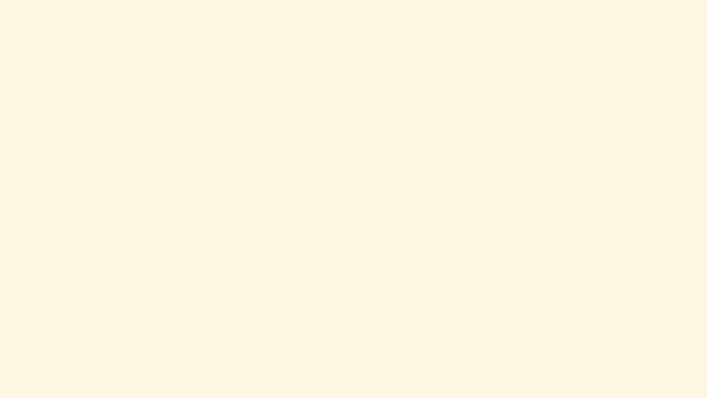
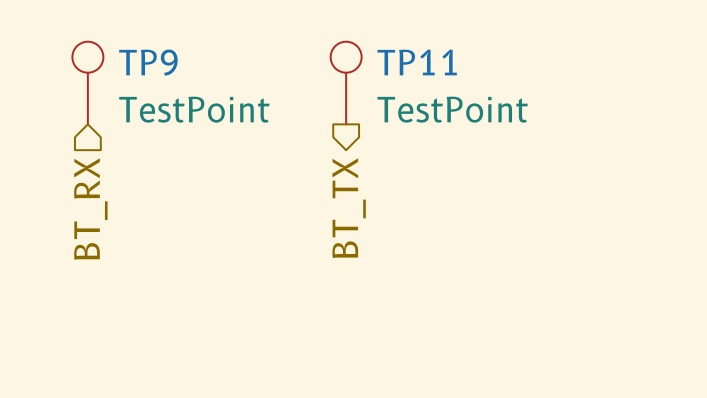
TP9: none -> TestPoint (87, 83)
TP11: none -> TestPoint (346, 83)
hierarchical label: none -> BT_TX (349, 208)
hierarchical label: none -> BT_RX (90, 209)

